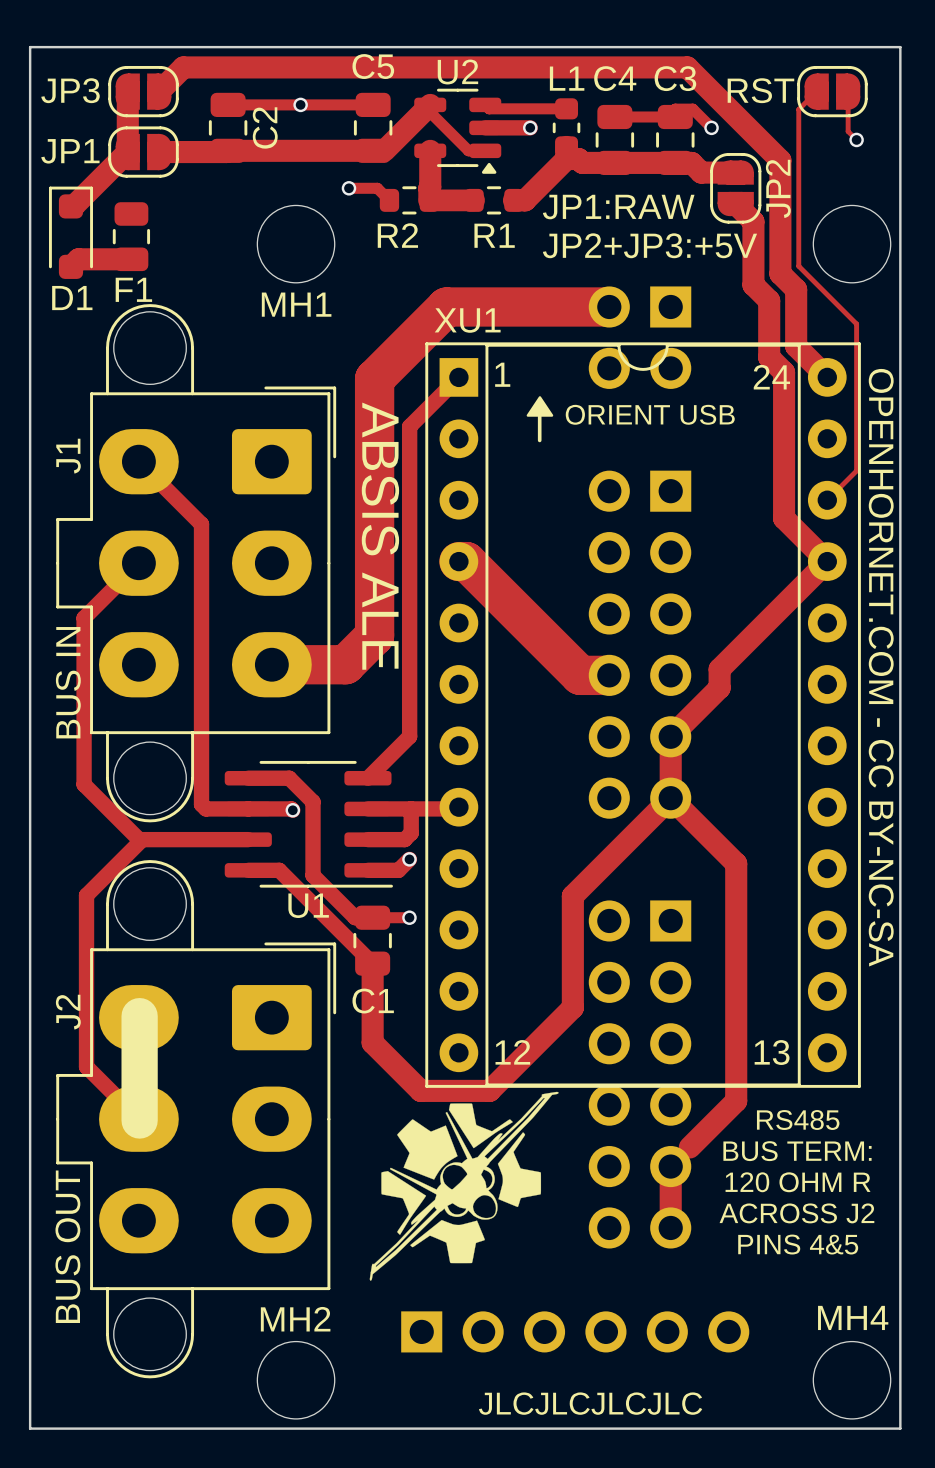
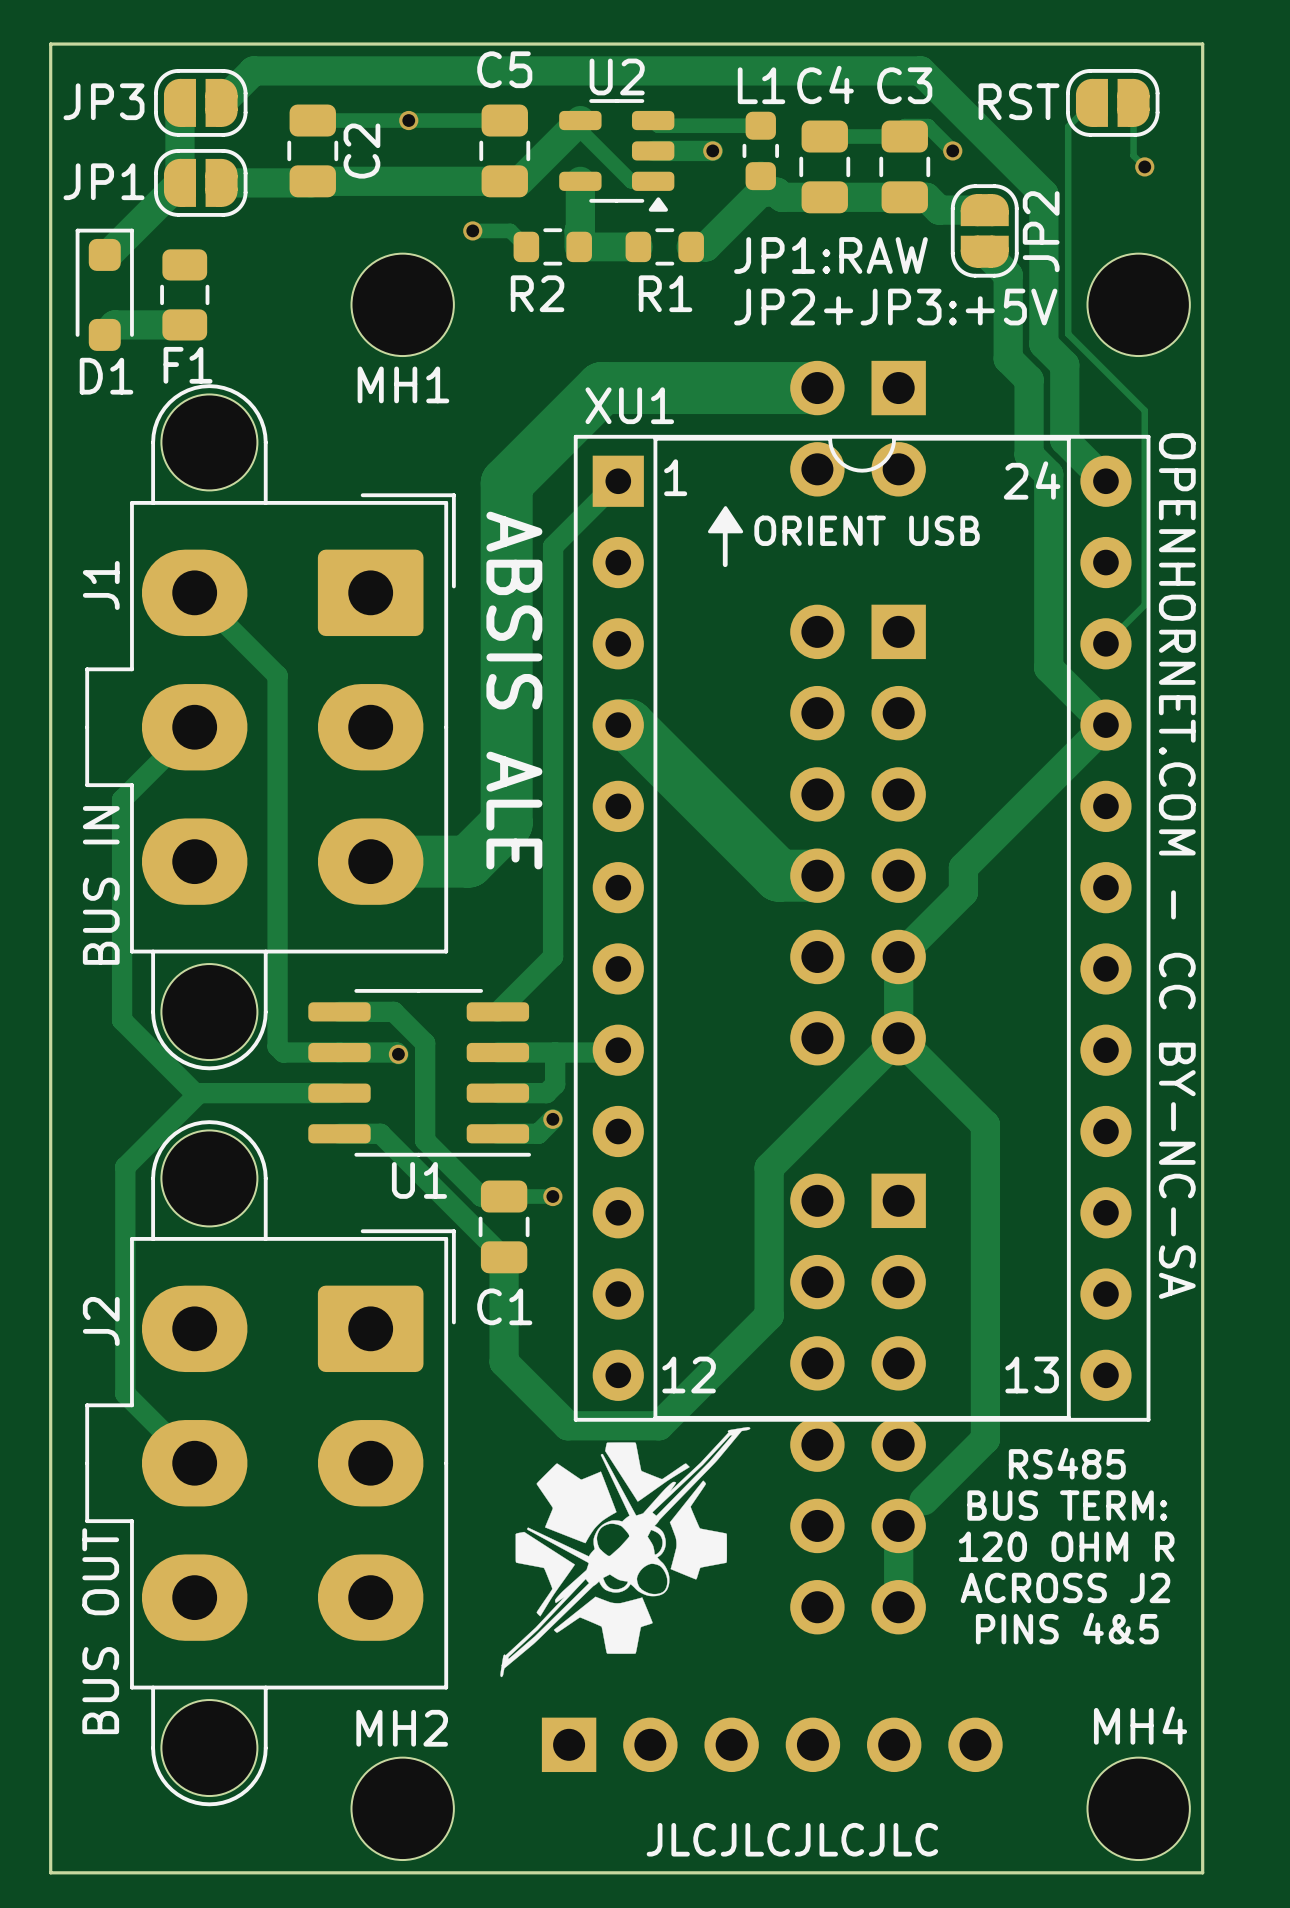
line: (139, 1016) (139, 1120) -> none

